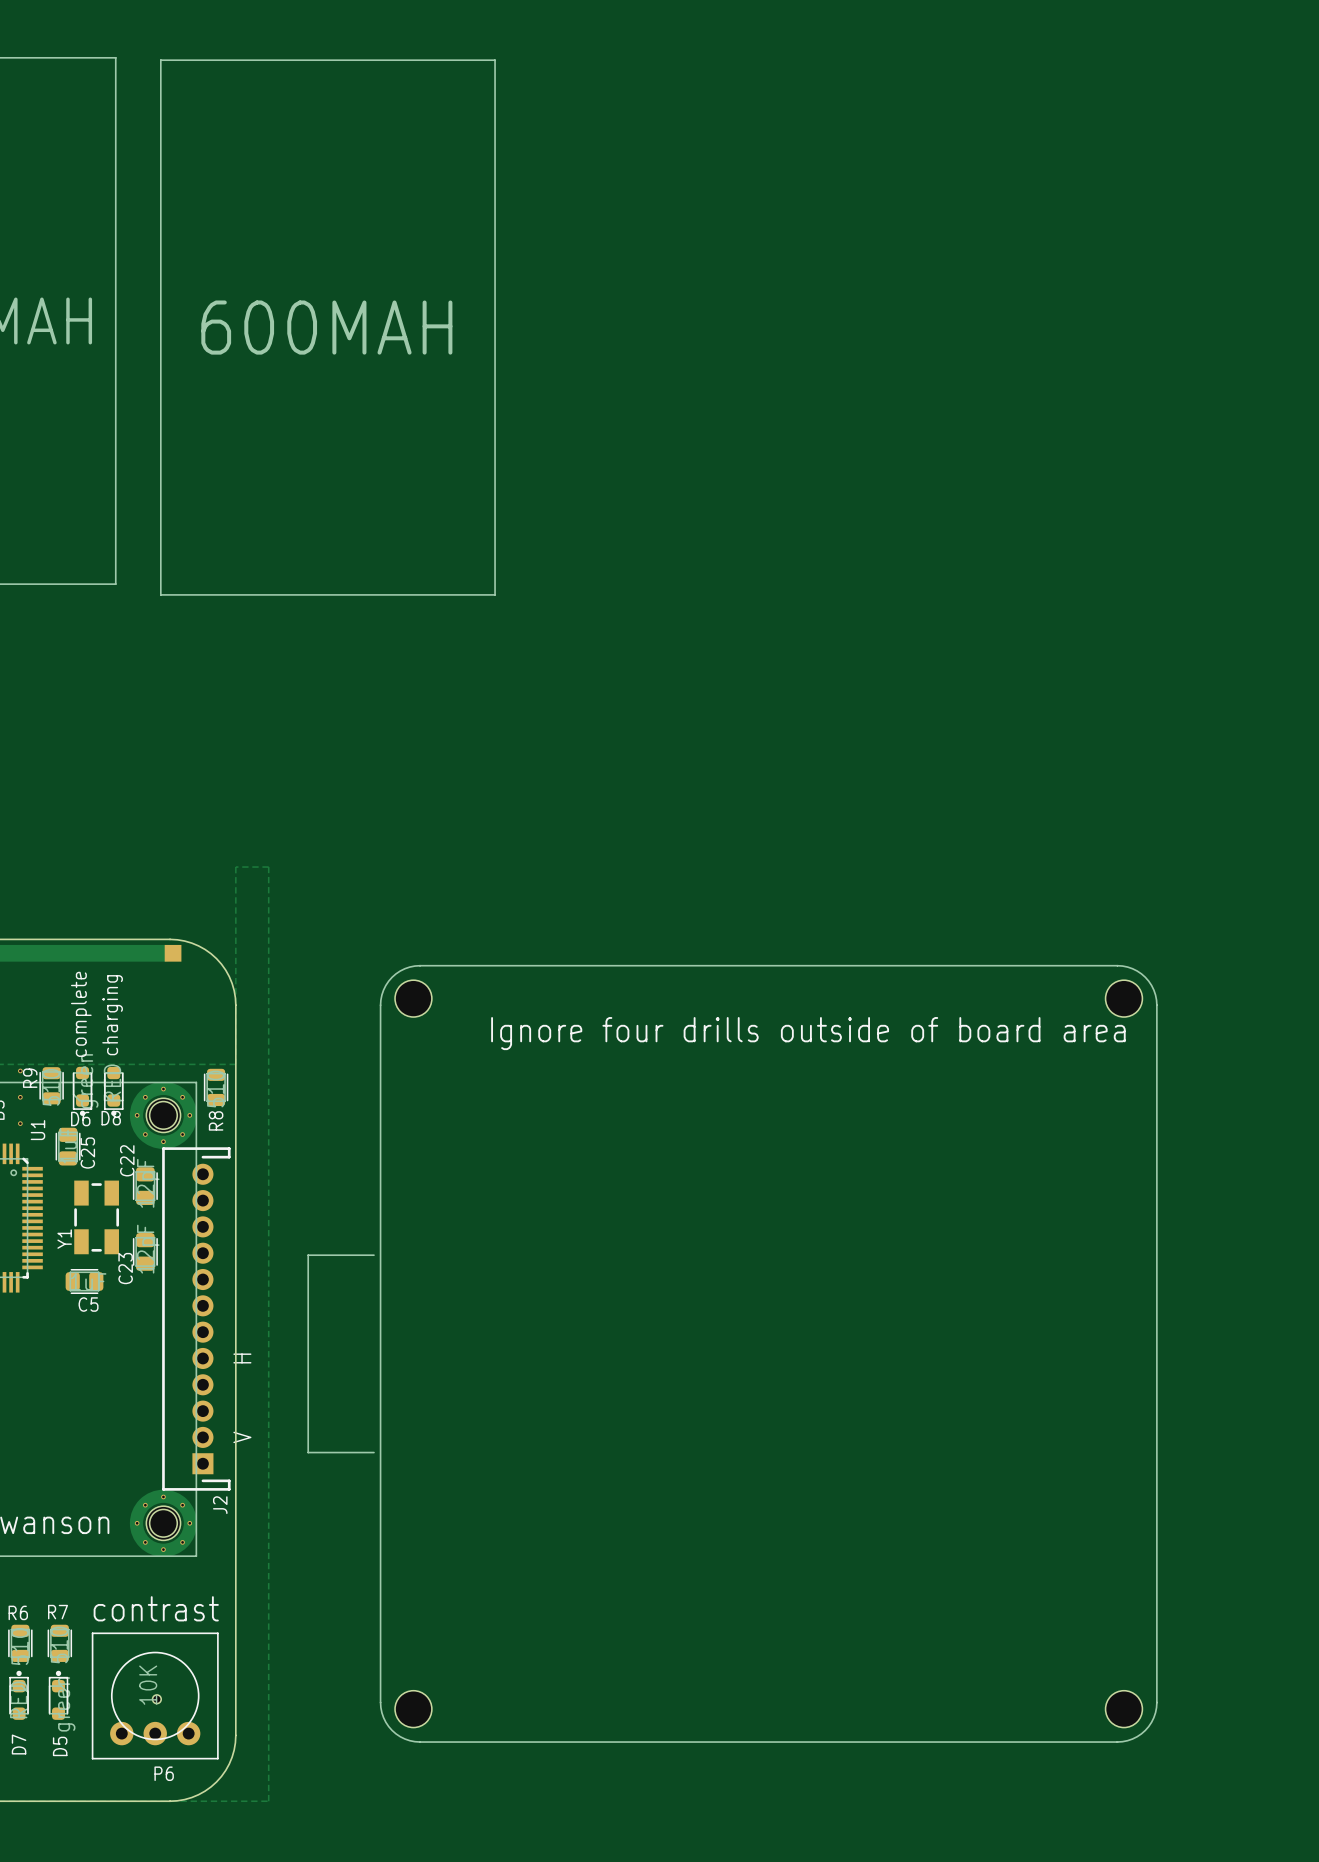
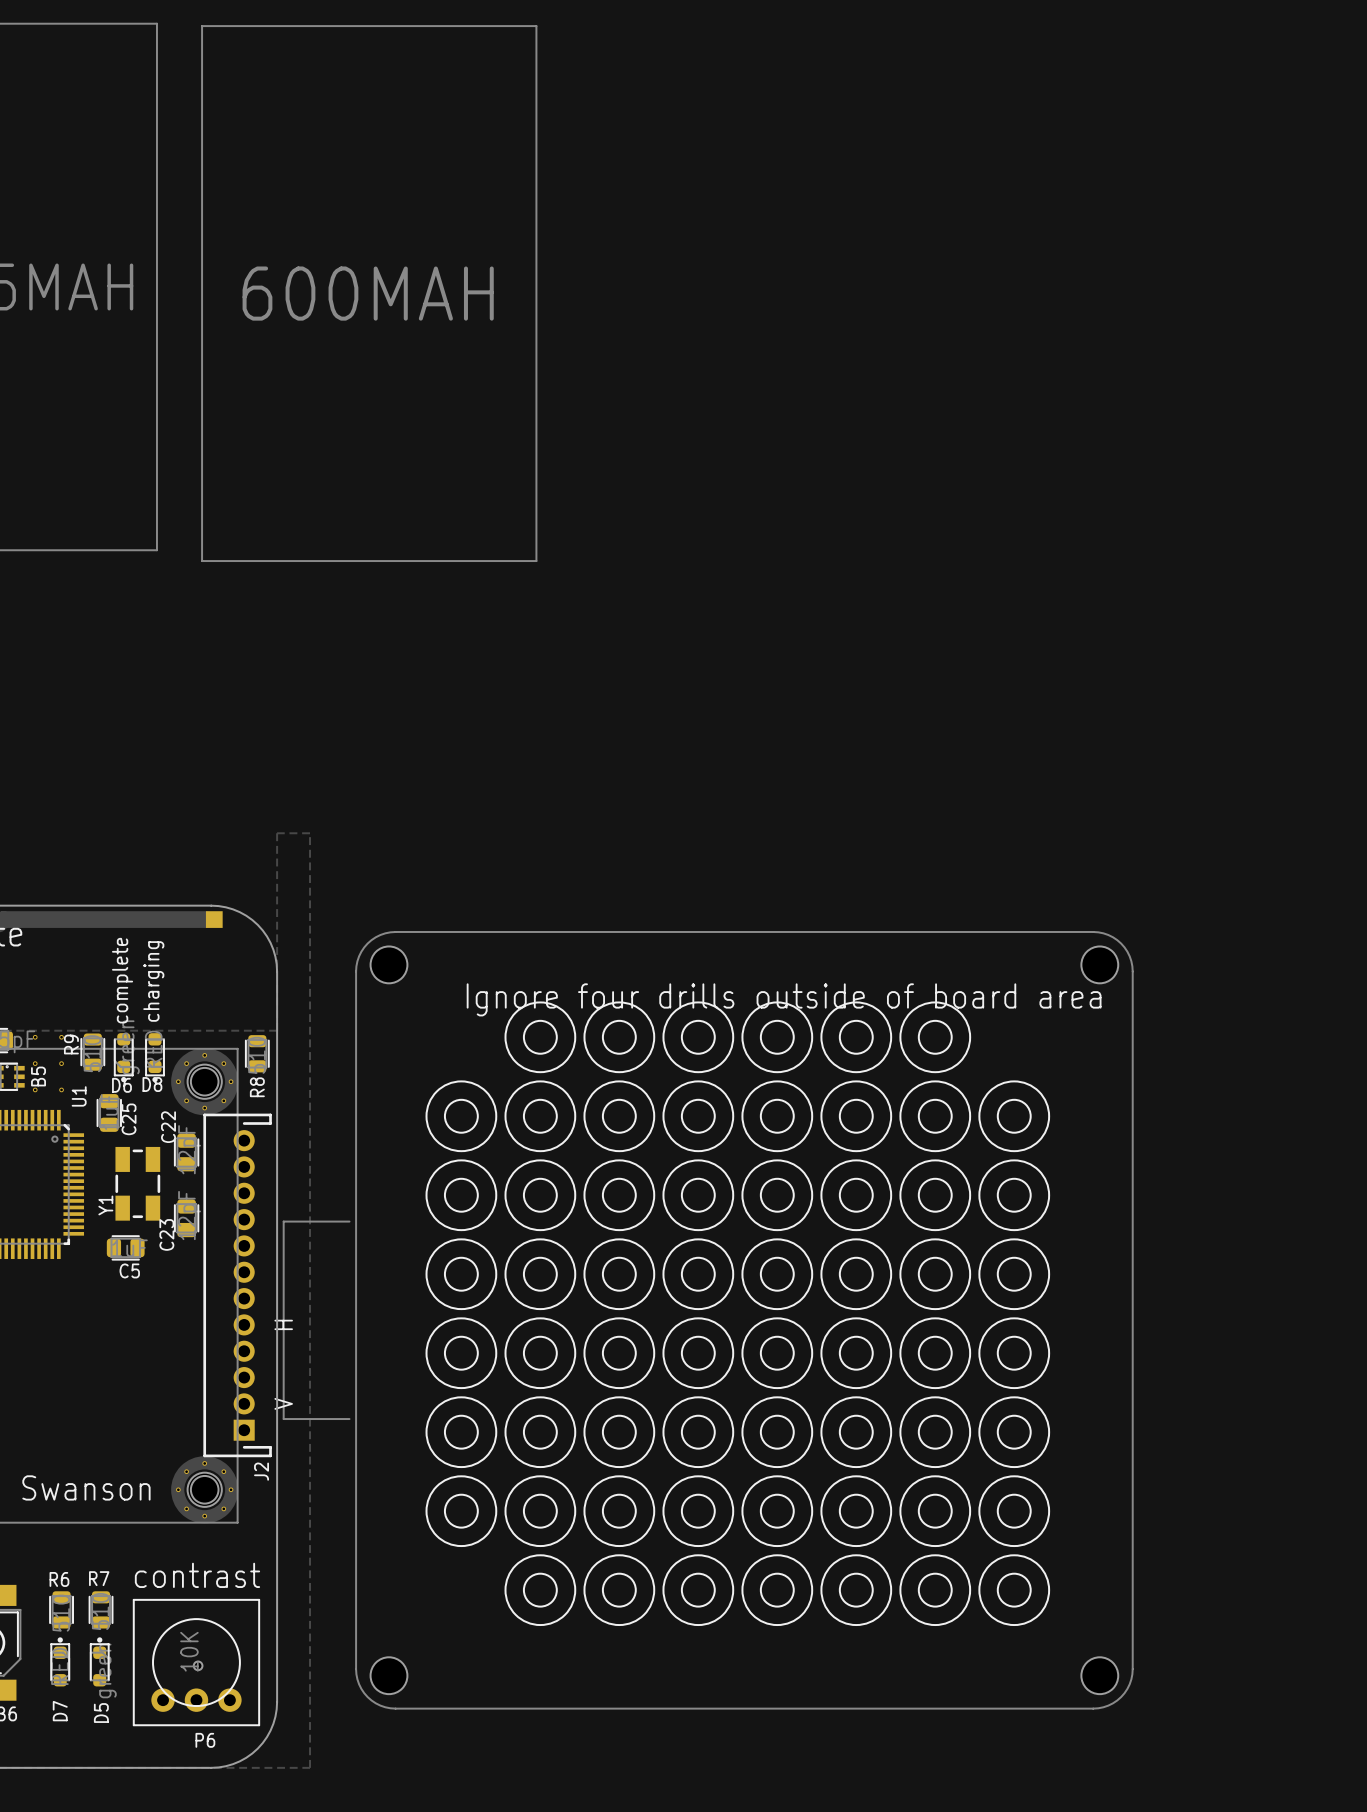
text position: Ignore four drills outside of board area (808, 1033) -> Ignore four drills outside of board area (784, 999)
drawing: none -> [425, 1001, 1050, 1626]
part position: (732, 1353) -> (708, 1320)

